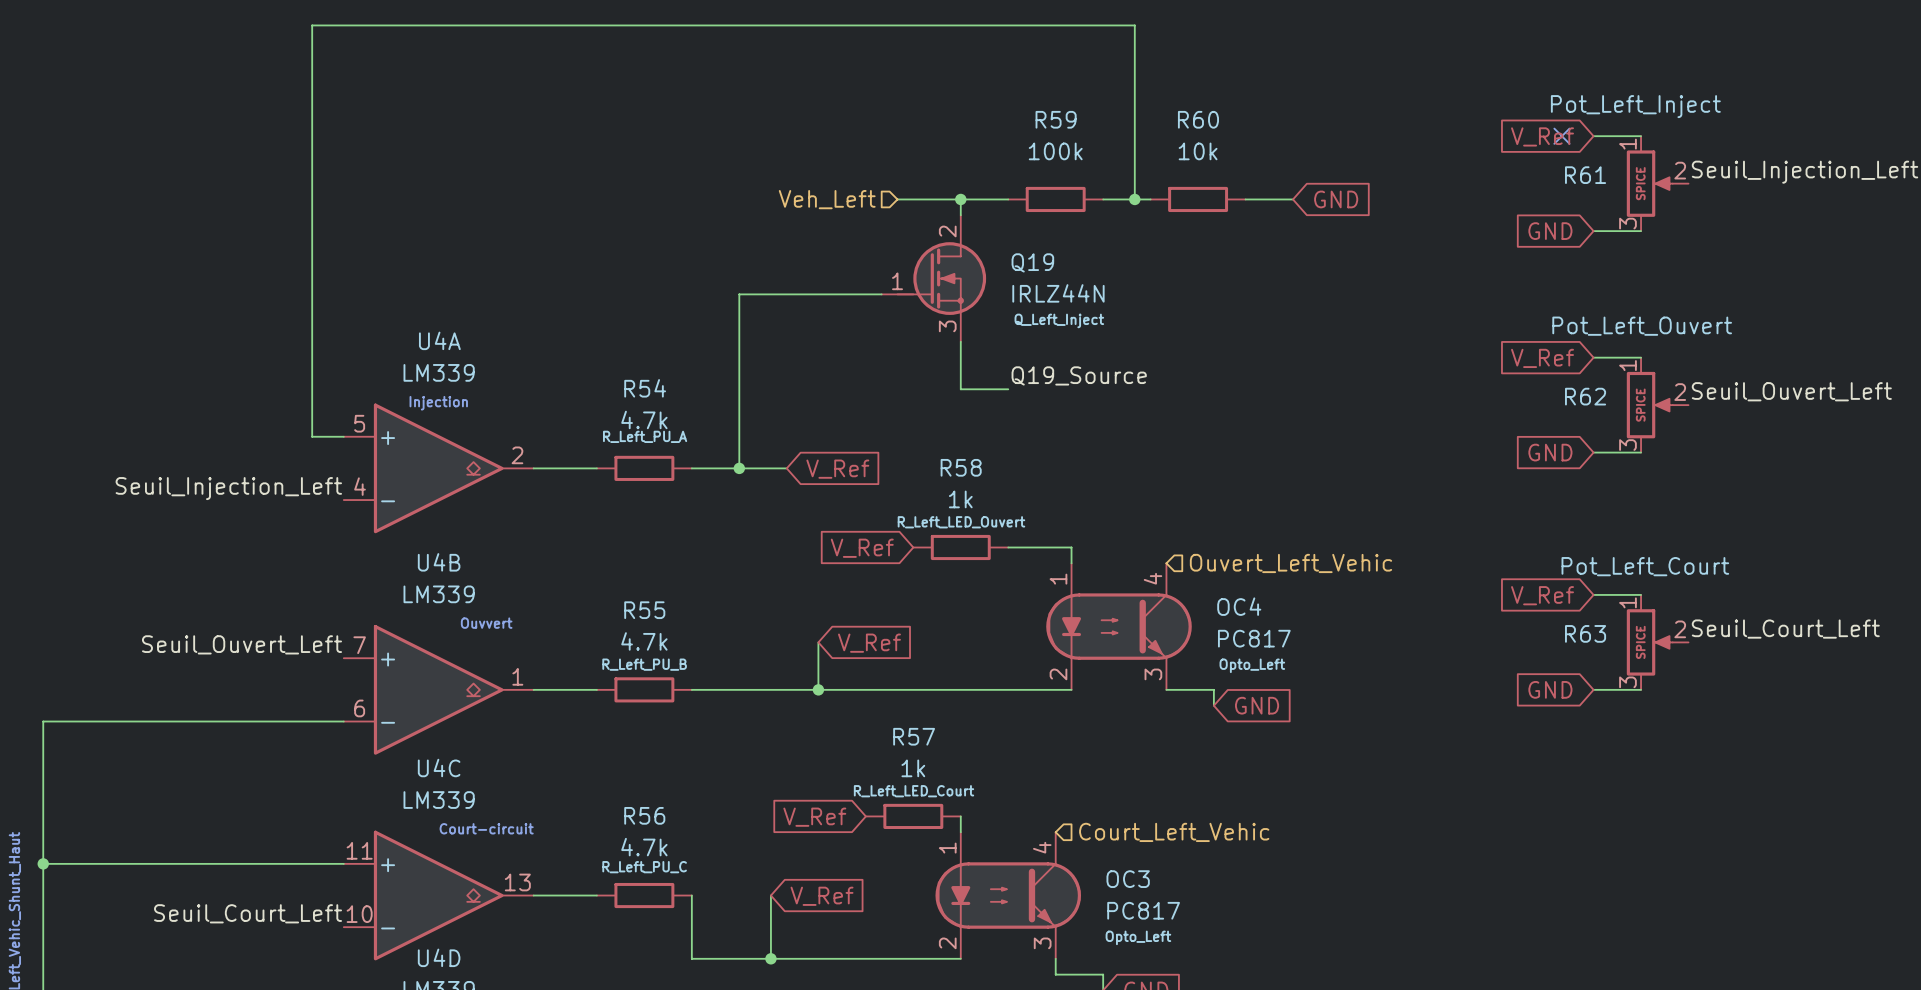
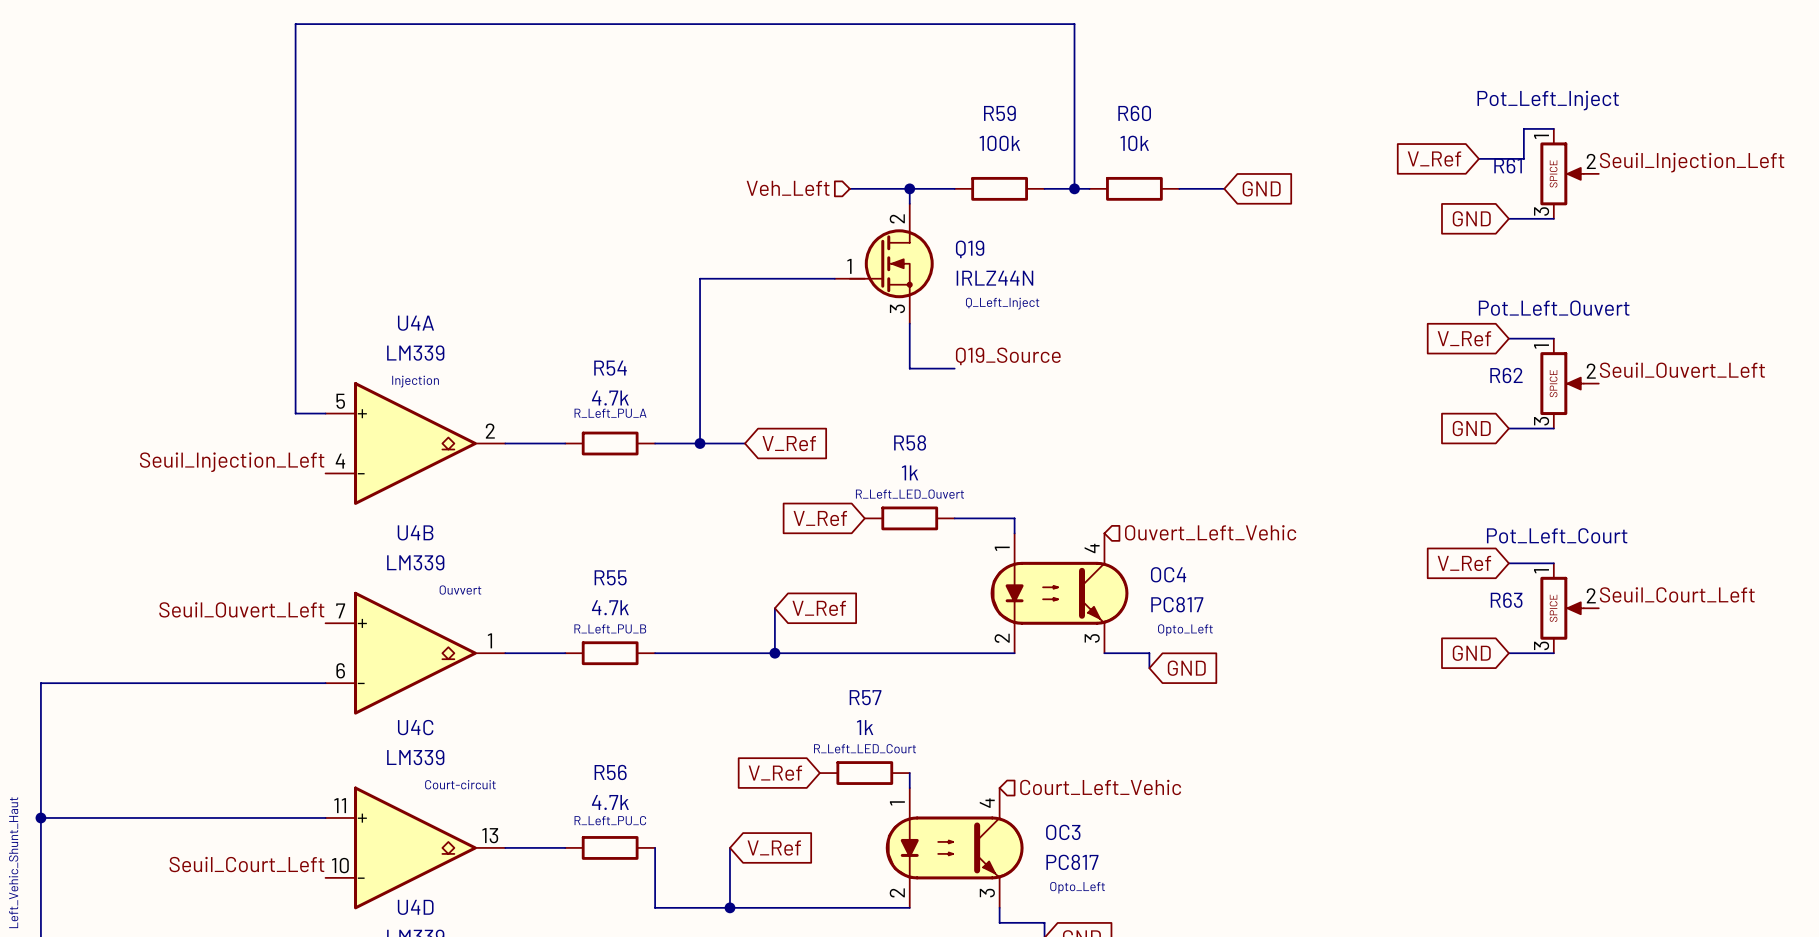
global label position: V_Ref (1542, 136) -> V_Ref (1434, 159)
no-connect mark: (1561, 136) -> none
wire: (1593, 136) (1609, 136) -> (1478, 158) (1523, 158) (1523, 128)

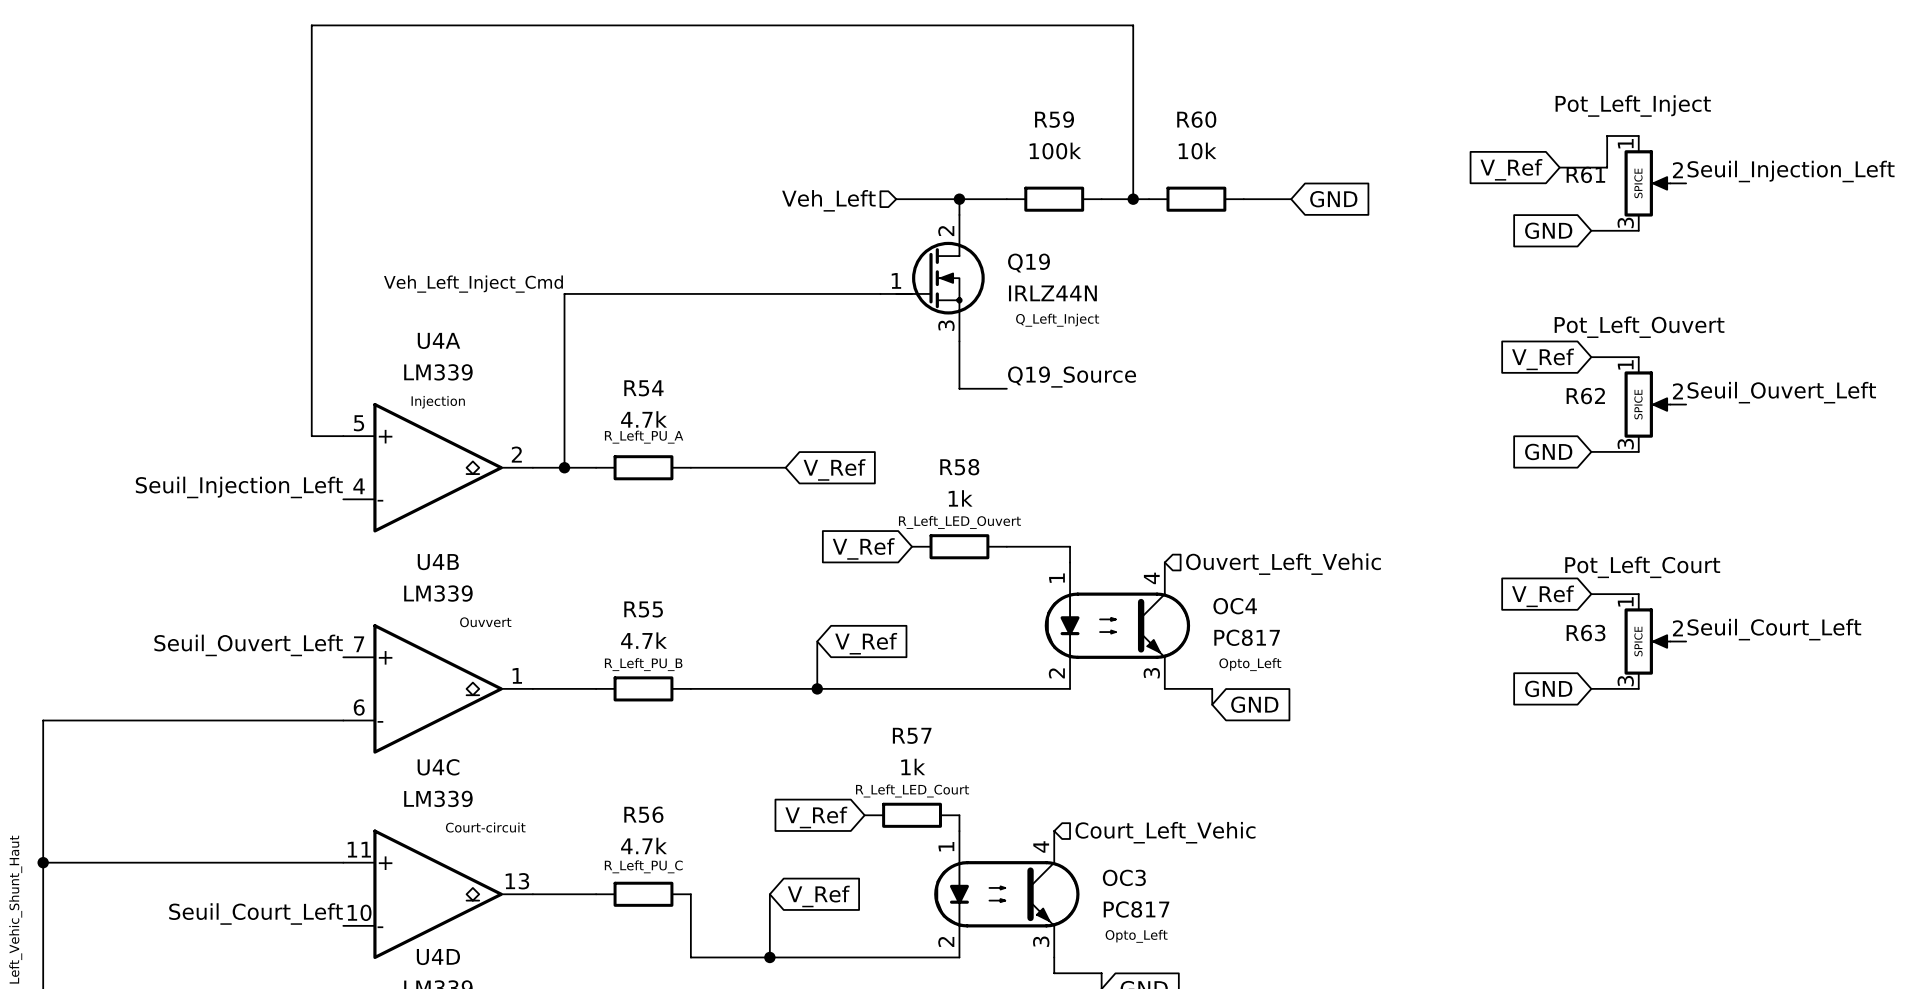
label: none -> Veh_Left_Inject_Cmd (473, 284)
wire: (700, 278) (700, 443) -> (738, 293) (564, 293) (564, 467)
junction: none -> (564, 467)
junction: (700, 443) -> none

